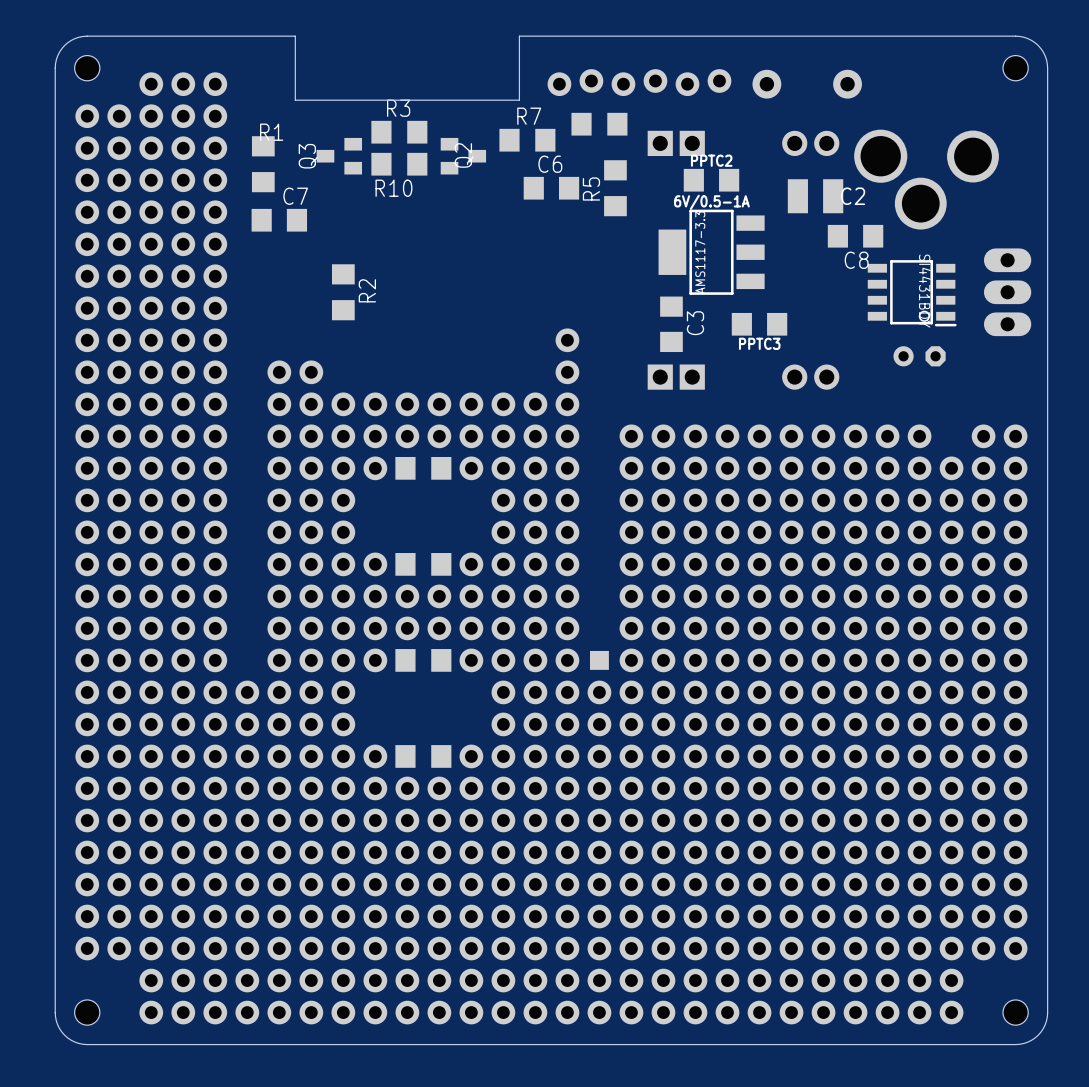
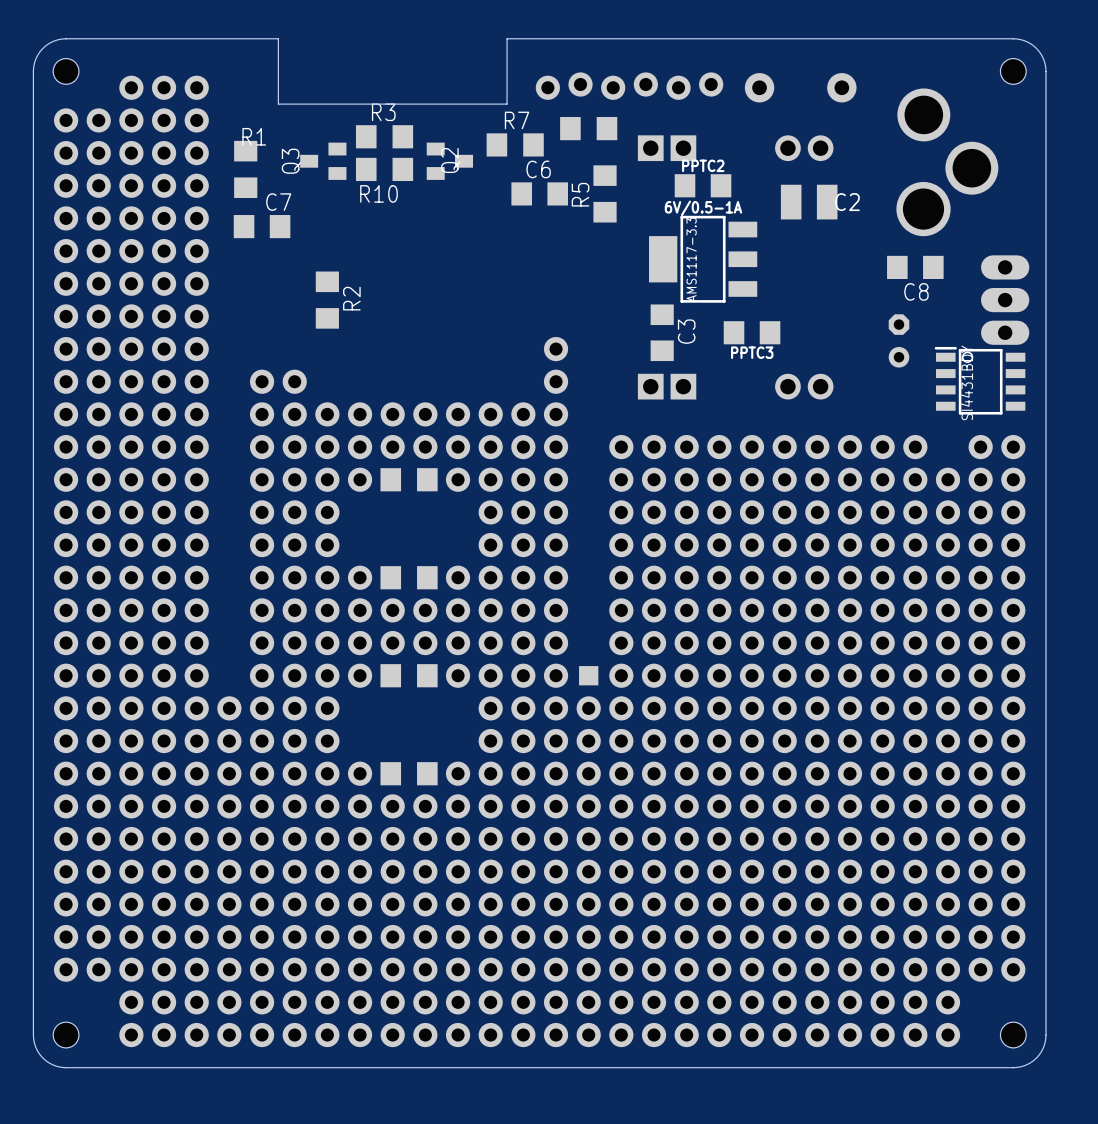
part rotation: 0° (926, 179) -> 90° counterclockwise (947, 162)
C8 position: (855, 236) -> (915, 267)
part rotation: 0° (912, 293) -> 180° (980, 380)
part position: (912, 293) -> (980, 380)
part rotation: 0° (919, 356) -> 90° counterclockwise (899, 340)

